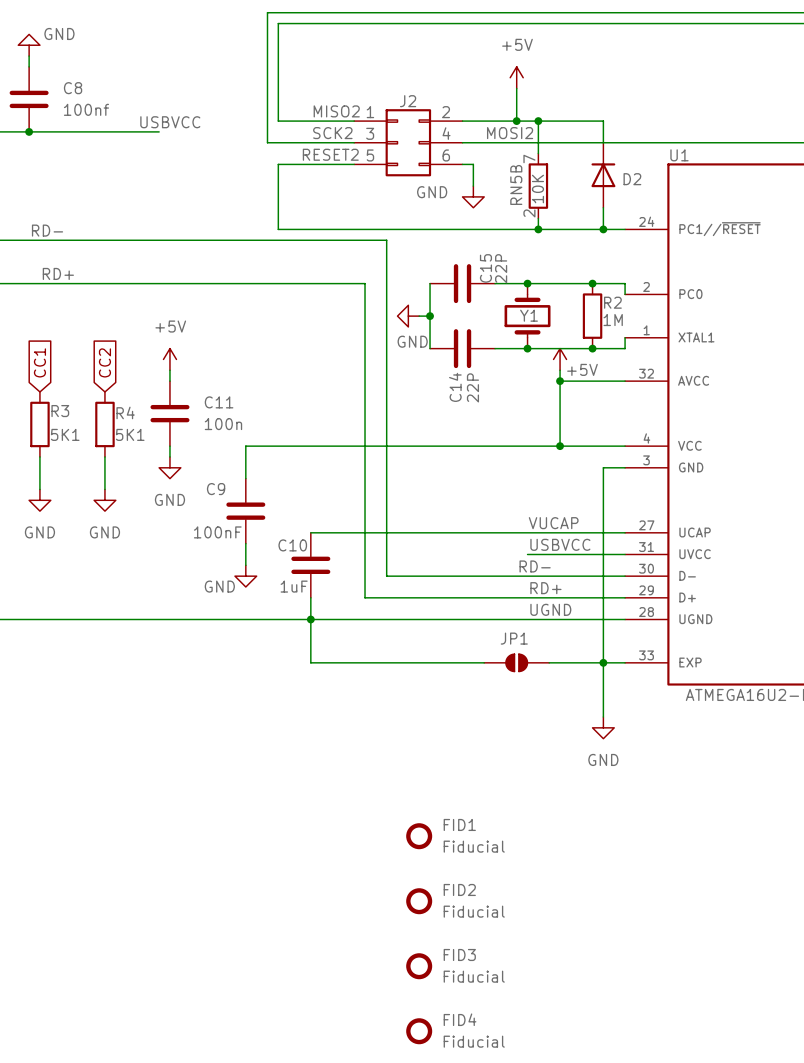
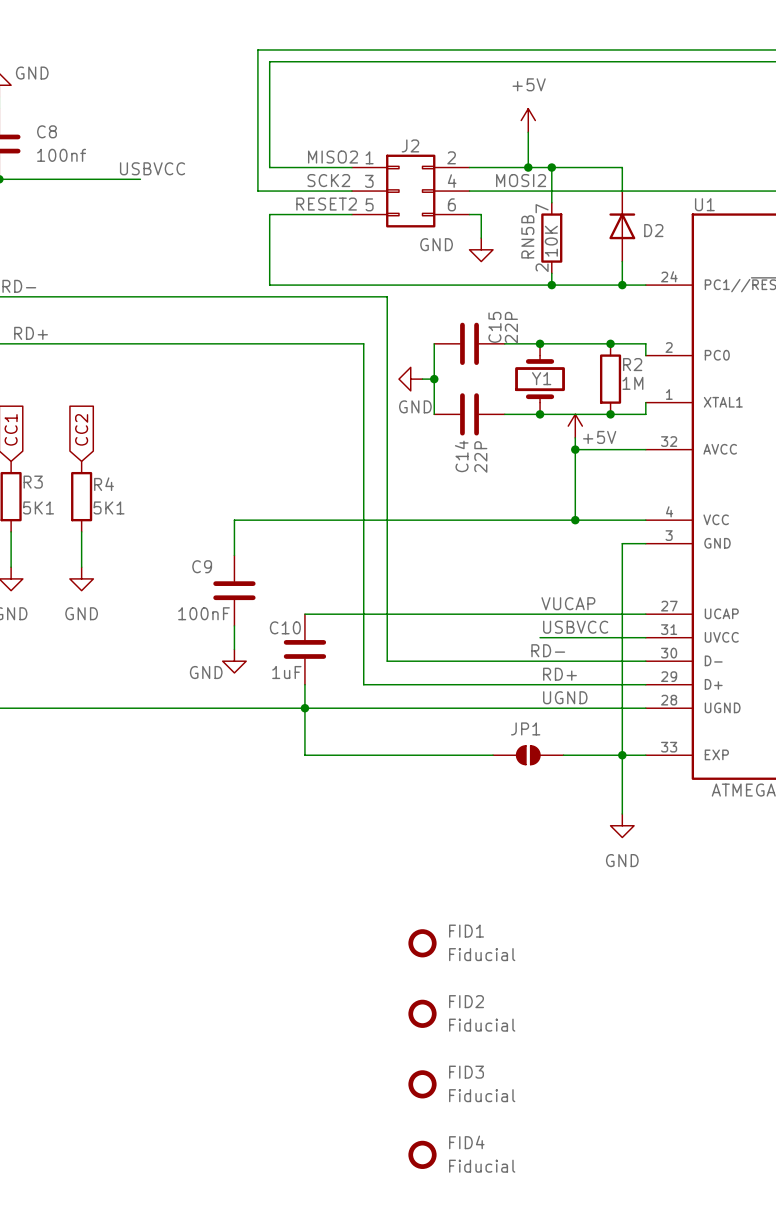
power symbol: +5V (169, 359) -> none
wire: (169, 370) (169, 381) -> none
C11: 100n (169, 413) -> none
wire: (169, 446) (169, 456) -> none
power symbol: GND (169, 467) -> none

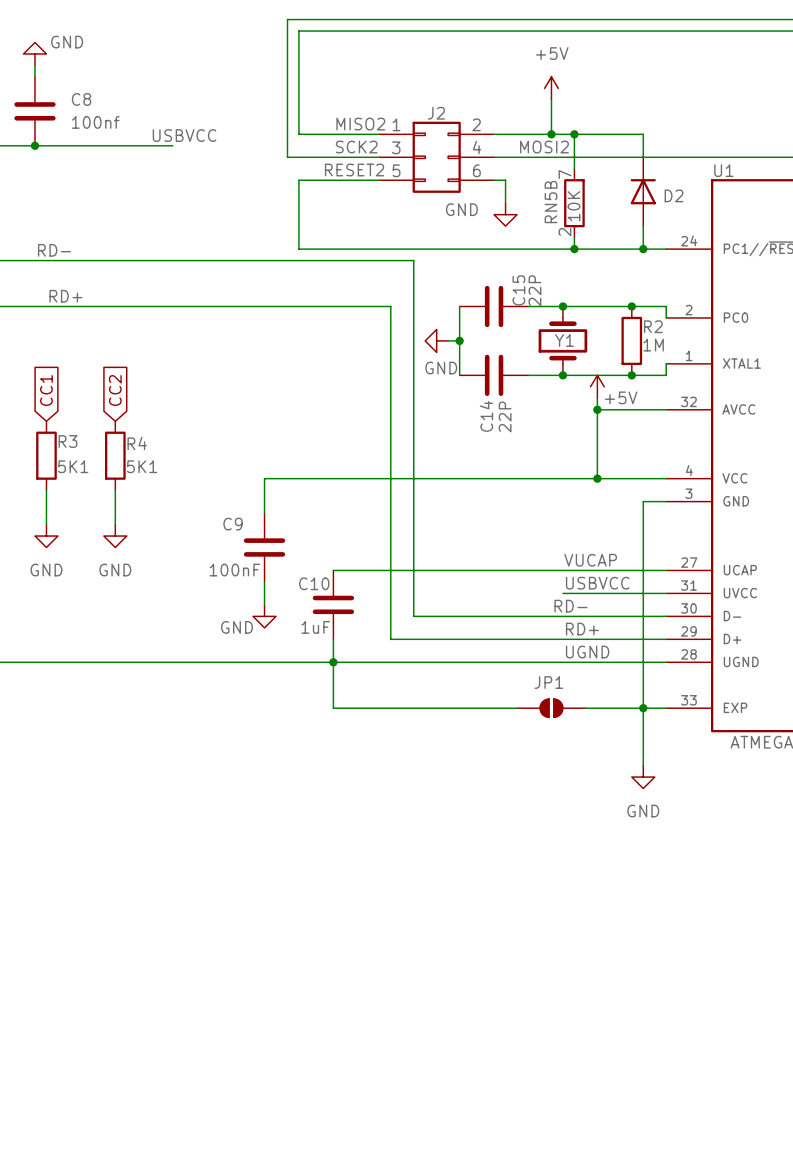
FID1: Fiducial (422, 943) -> none
FID2: Fiducial (422, 1013) -> none
FID3: Fiducial (422, 1084) -> none
FID4: Fiducial (422, 1154) -> none

